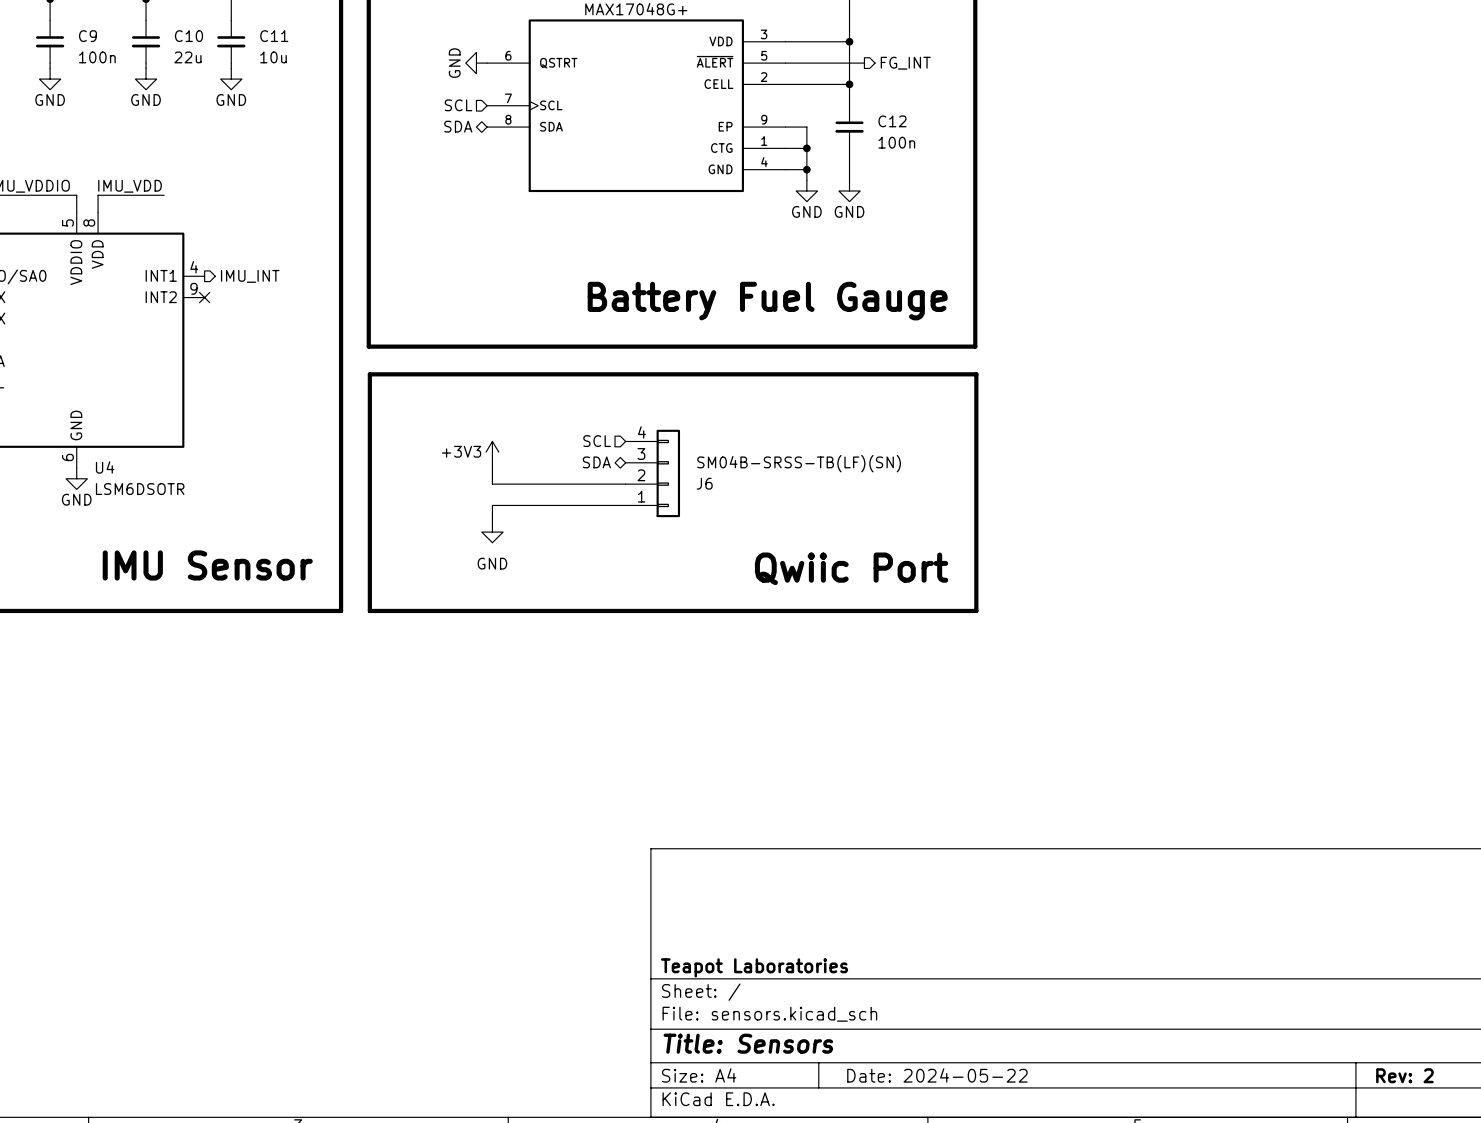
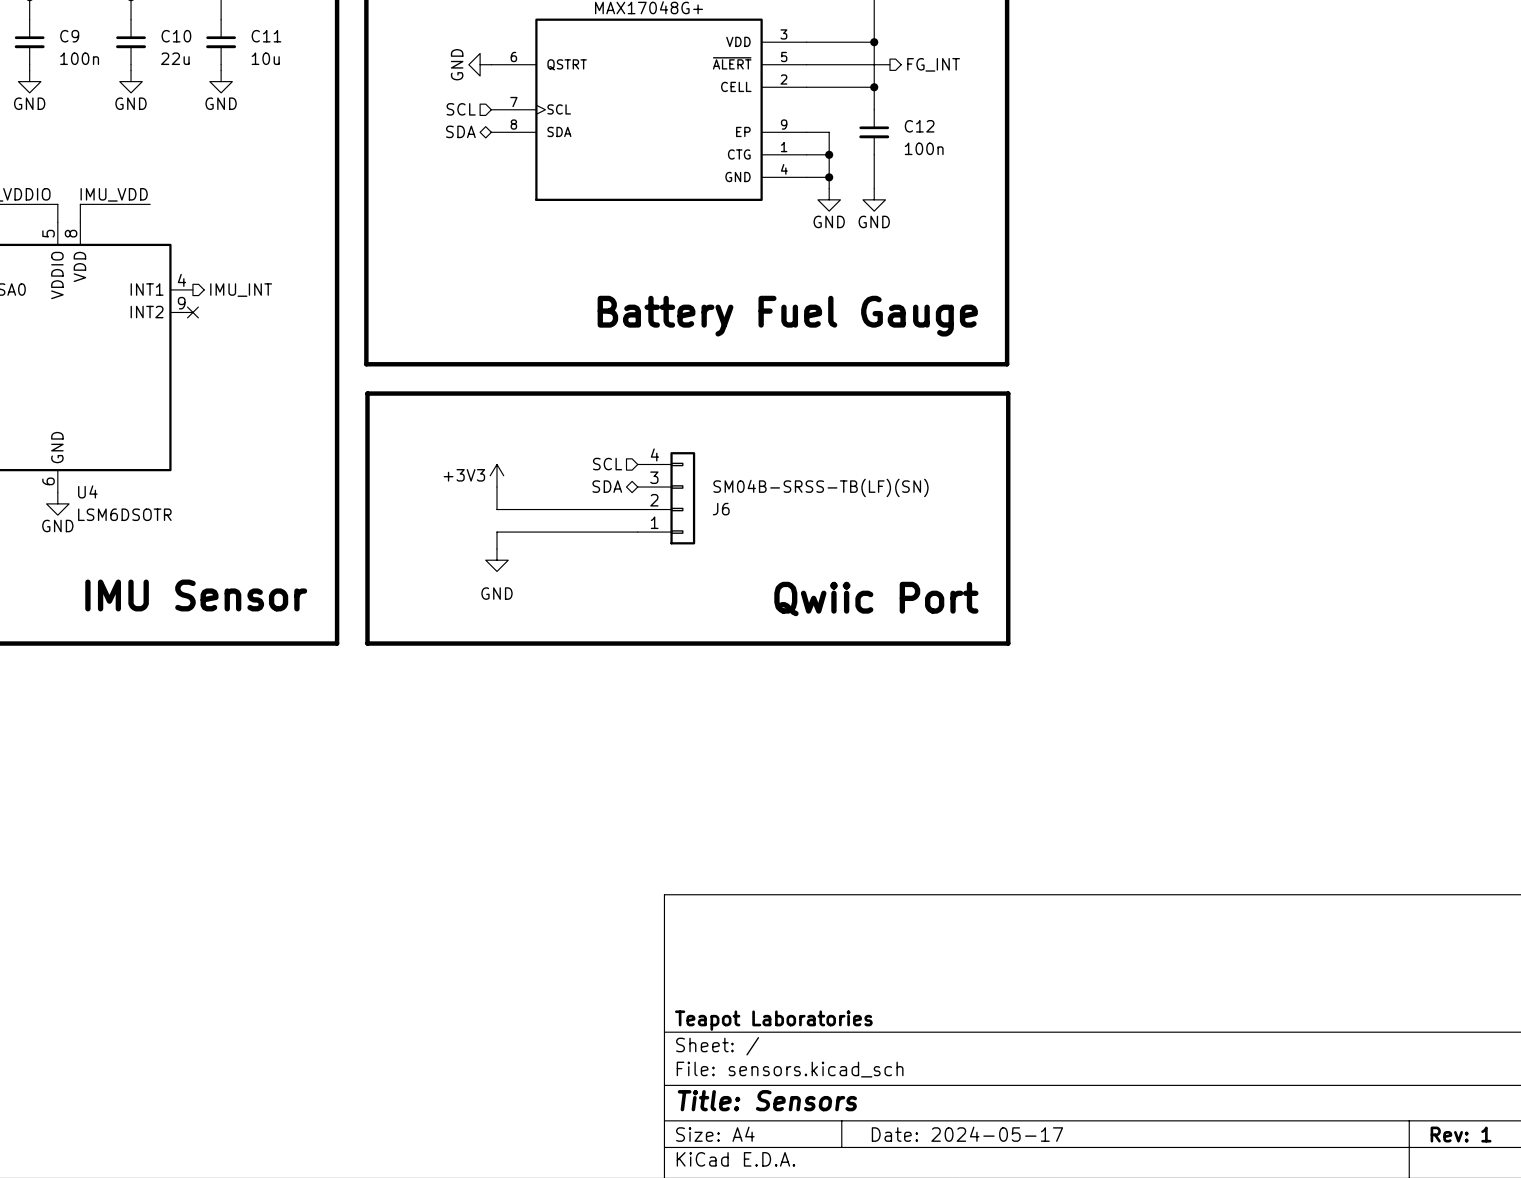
title block: Date: 2024-05-22 (937, 1075) -> Date: 2024-05-17 (967, 1134)
title block: Rev: 2 (1404, 1075) -> Rev: 1 (1461, 1134)

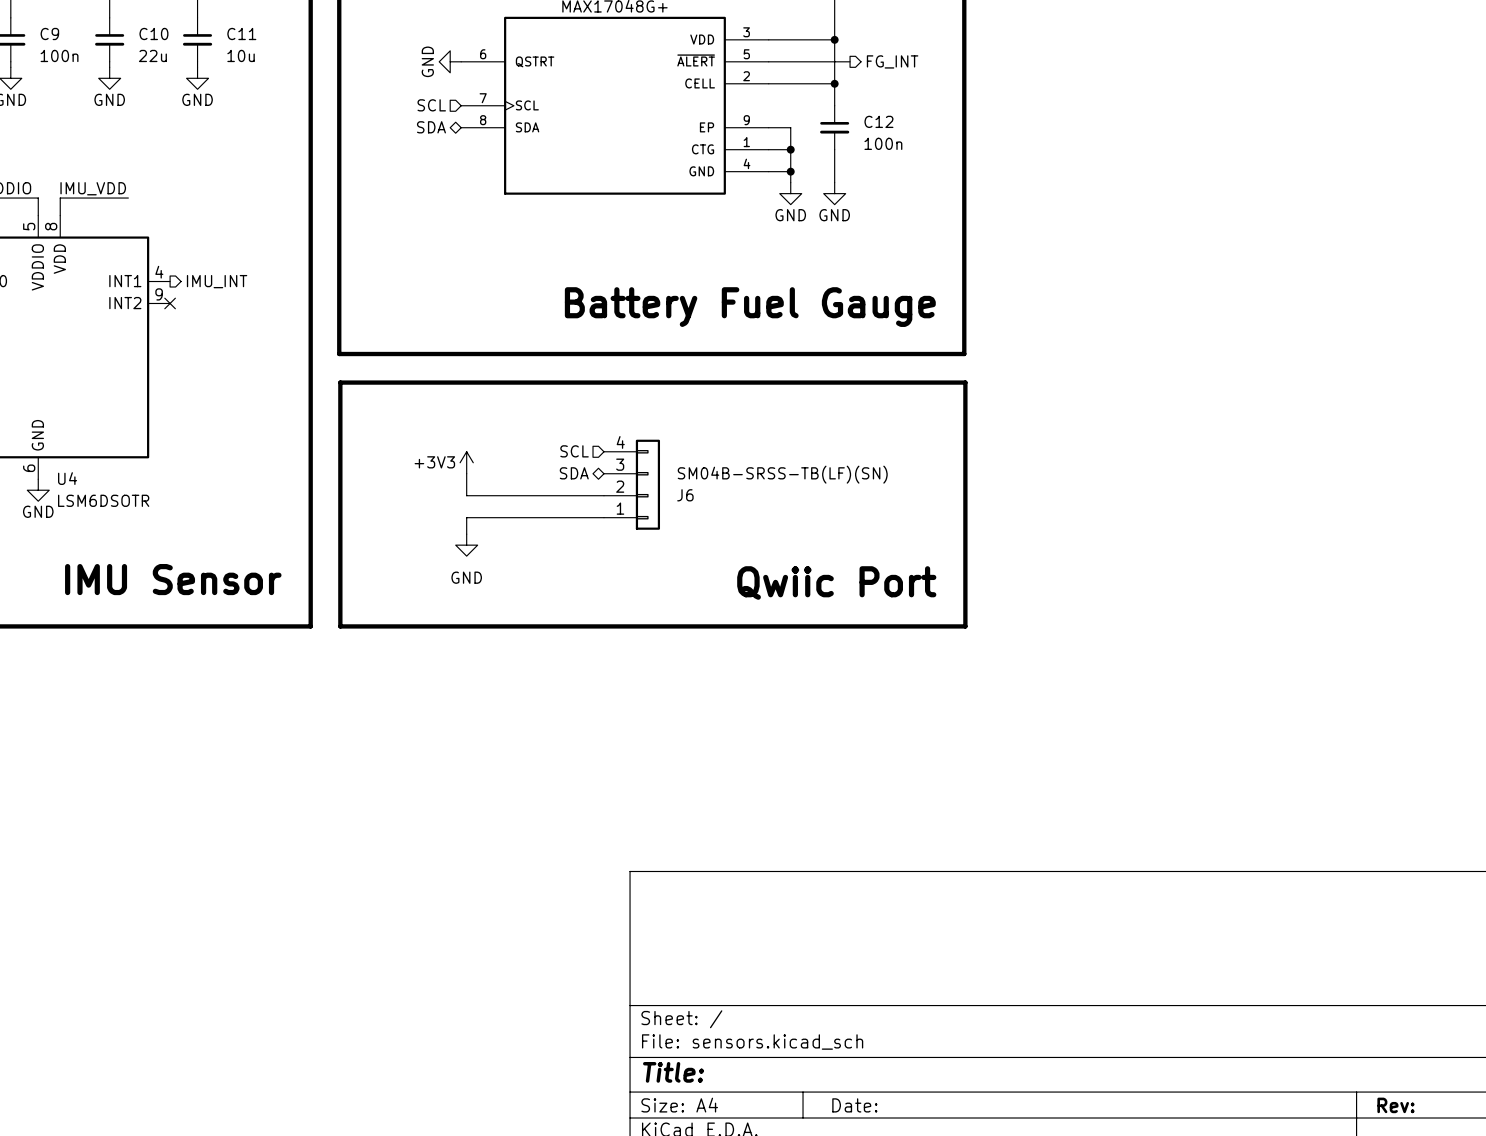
title block: Teapot Laboratories (773, 1020) -> none
title block: Title: Sensors (767, 1100) -> Title: (673, 1072)
title block: Date: 2024-05-17 (967, 1134) -> Date: (854, 1105)
title block: Rev: 1 (1461, 1134) -> Rev: (1395, 1105)

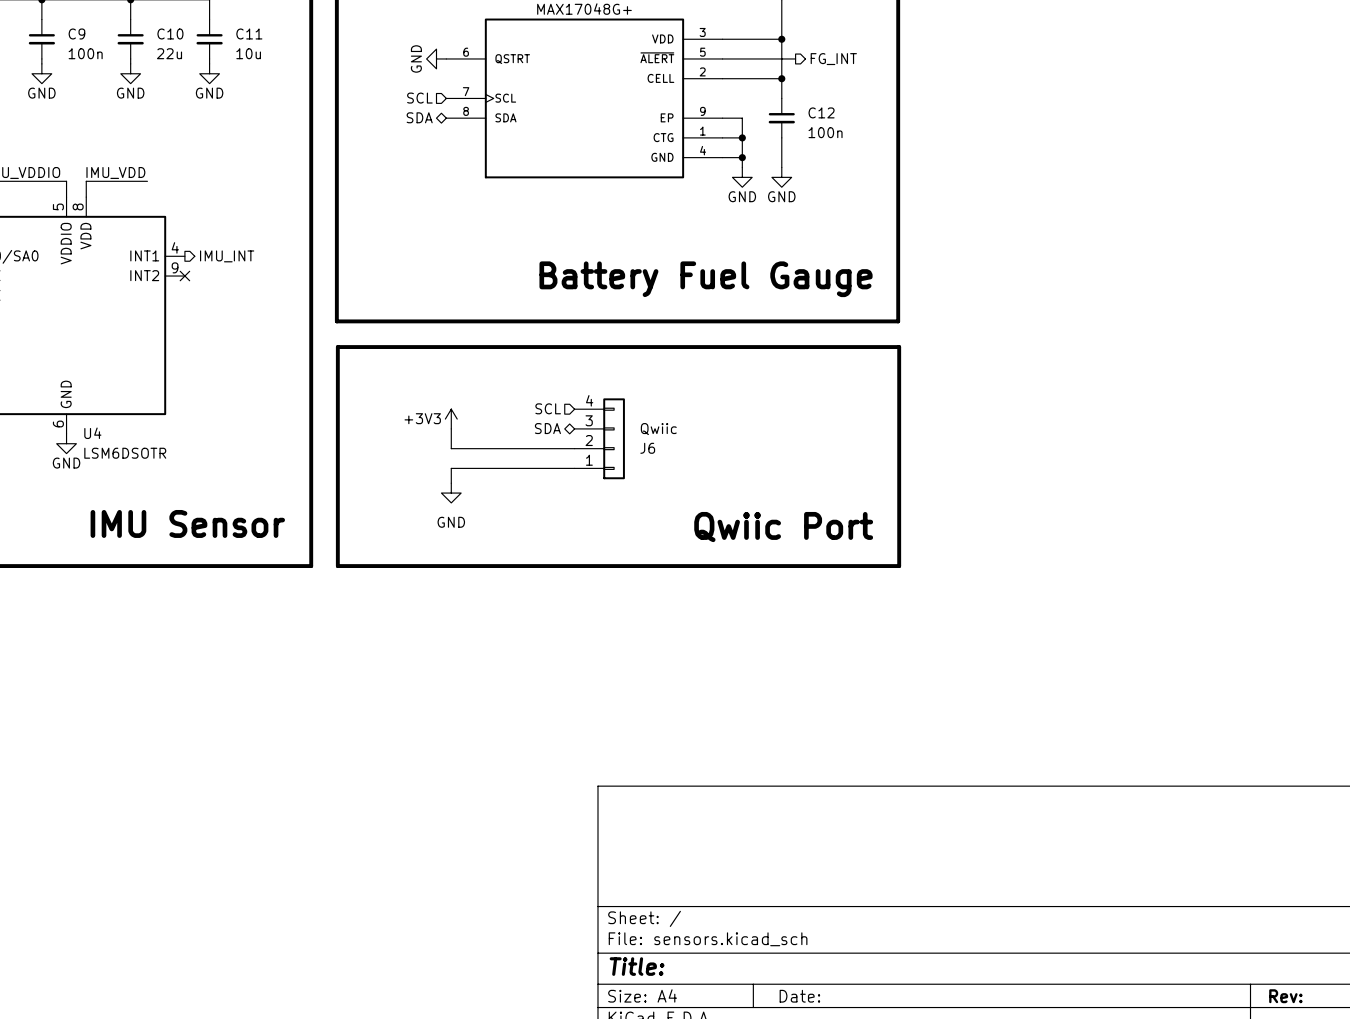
J6 value: SM04B-SRSS-TB(LF)(SN) (782, 474) -> Qwiic (658, 429)

